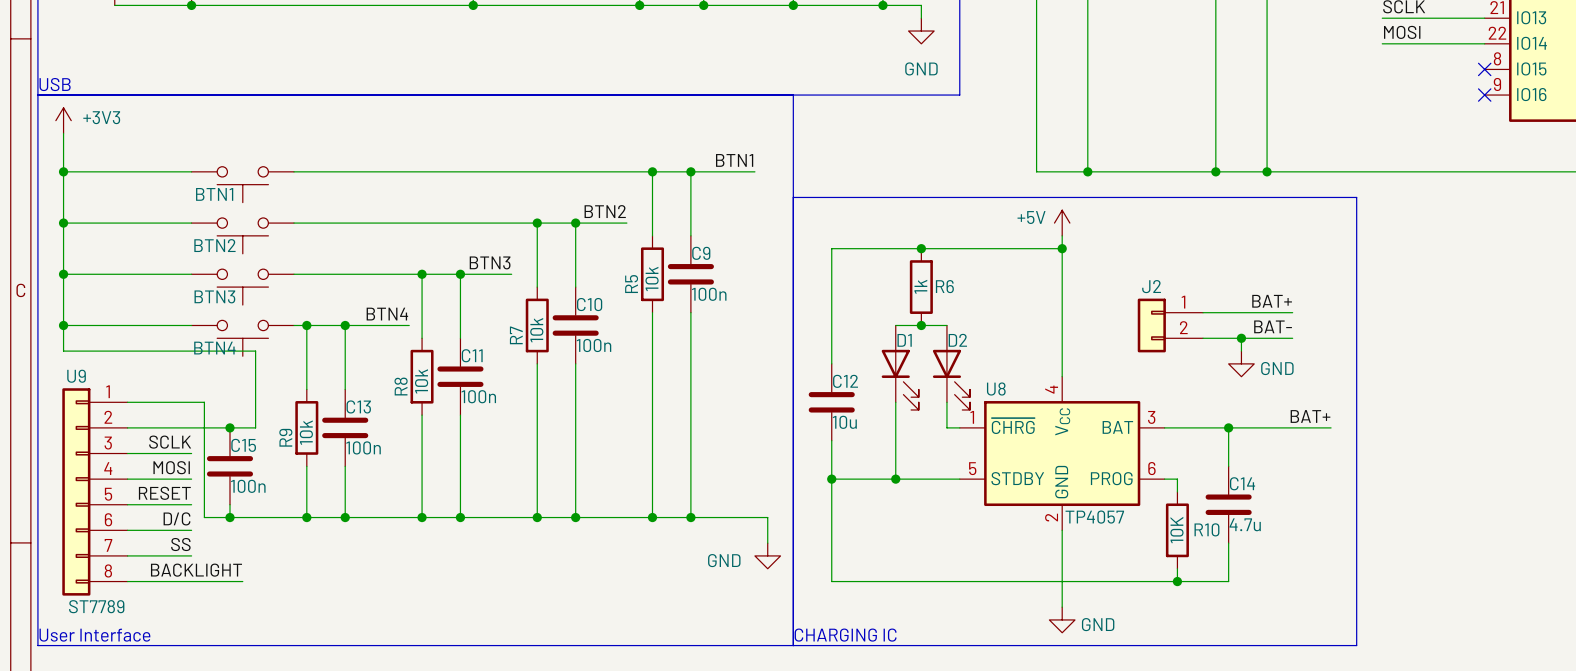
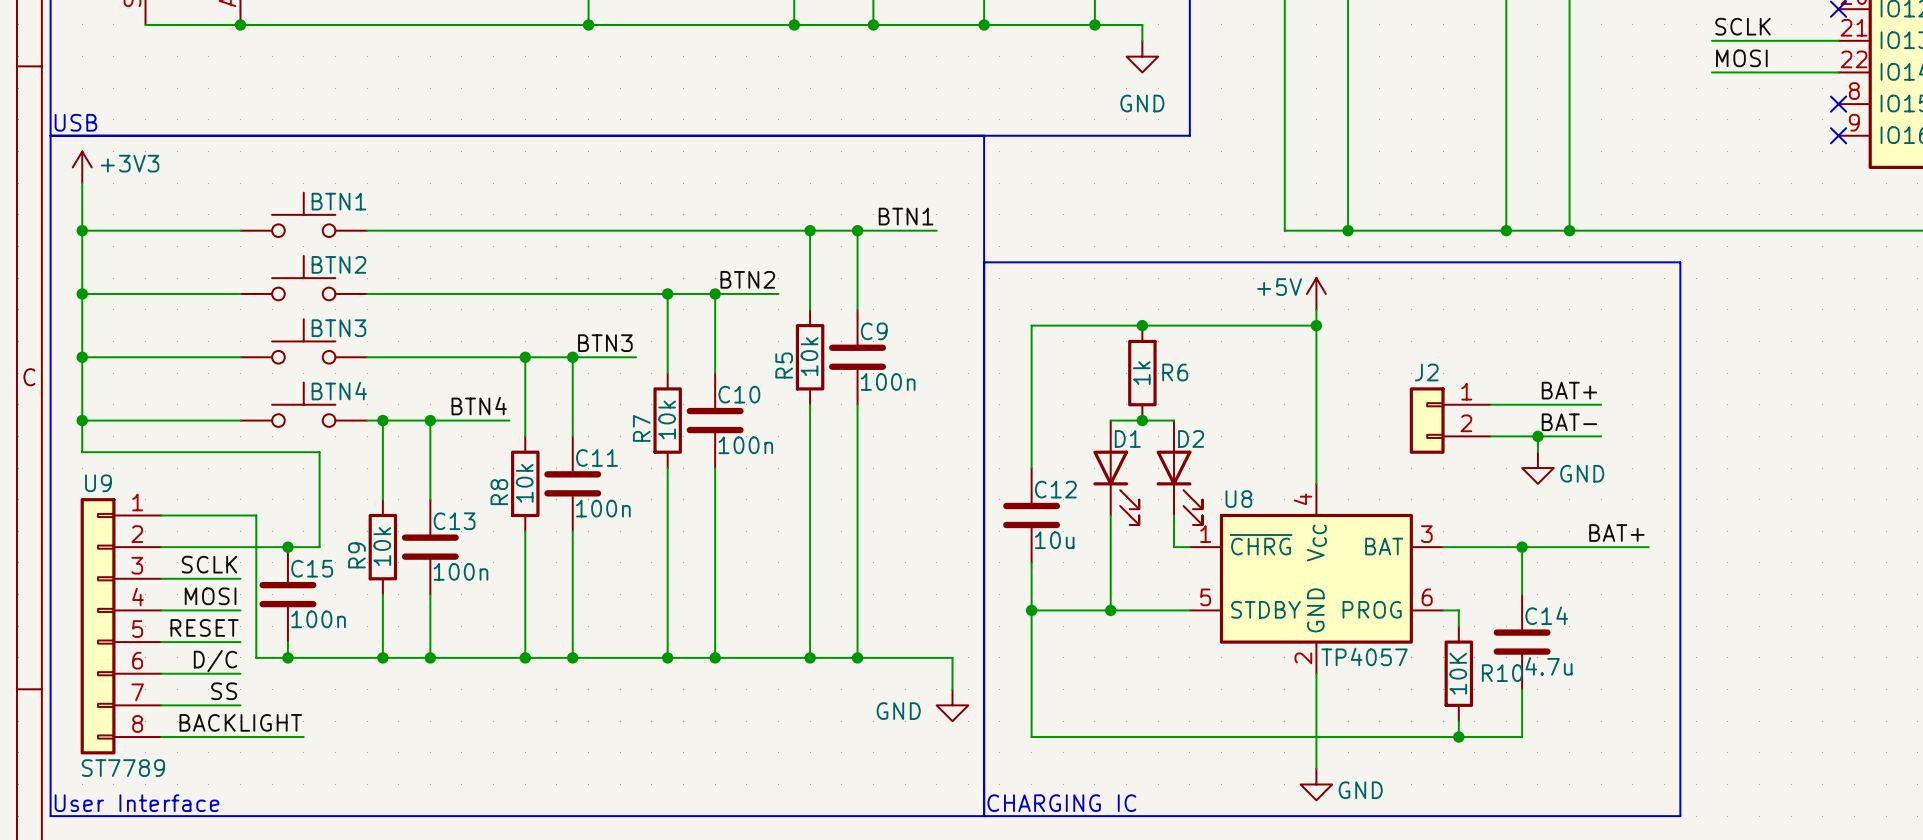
BTN1 rotation: 0° (242, 184) -> 180° (303, 214)
BTN2 rotation: 0° (242, 235) -> 180° (303, 278)
BTN3 rotation: 0° (242, 287) -> 180° (303, 341)
BTN4 rotation: 0° (242, 338) -> 180° (303, 404)

